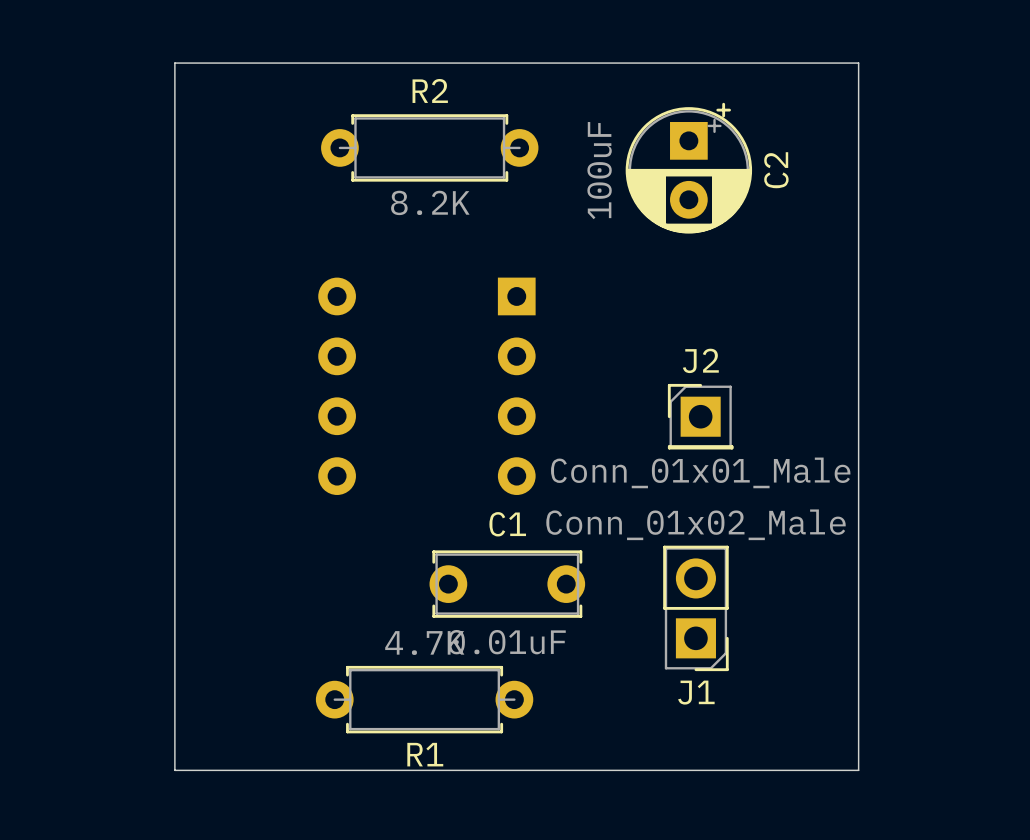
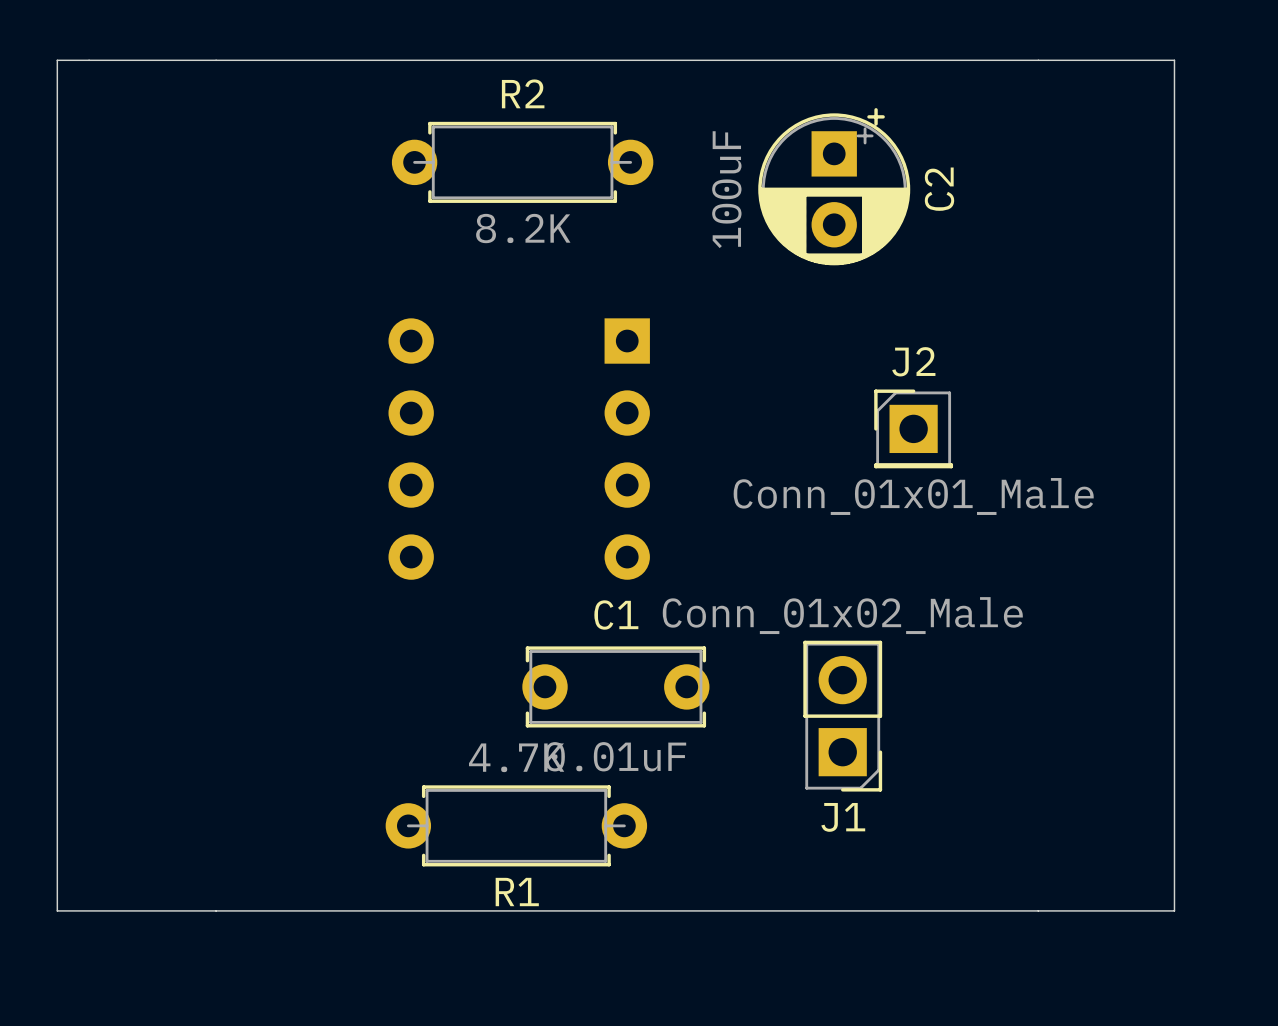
board edge: (174, 63) (174, 770) -> (216, 60) (57, 60) (57, 910) (216, 910)
board edge: (858, 63) (858, 770) -> (1038, 60) (1174, 60) (1174, 910) (1038, 910)
J2 position: (700, 416) -> (913, 428)

